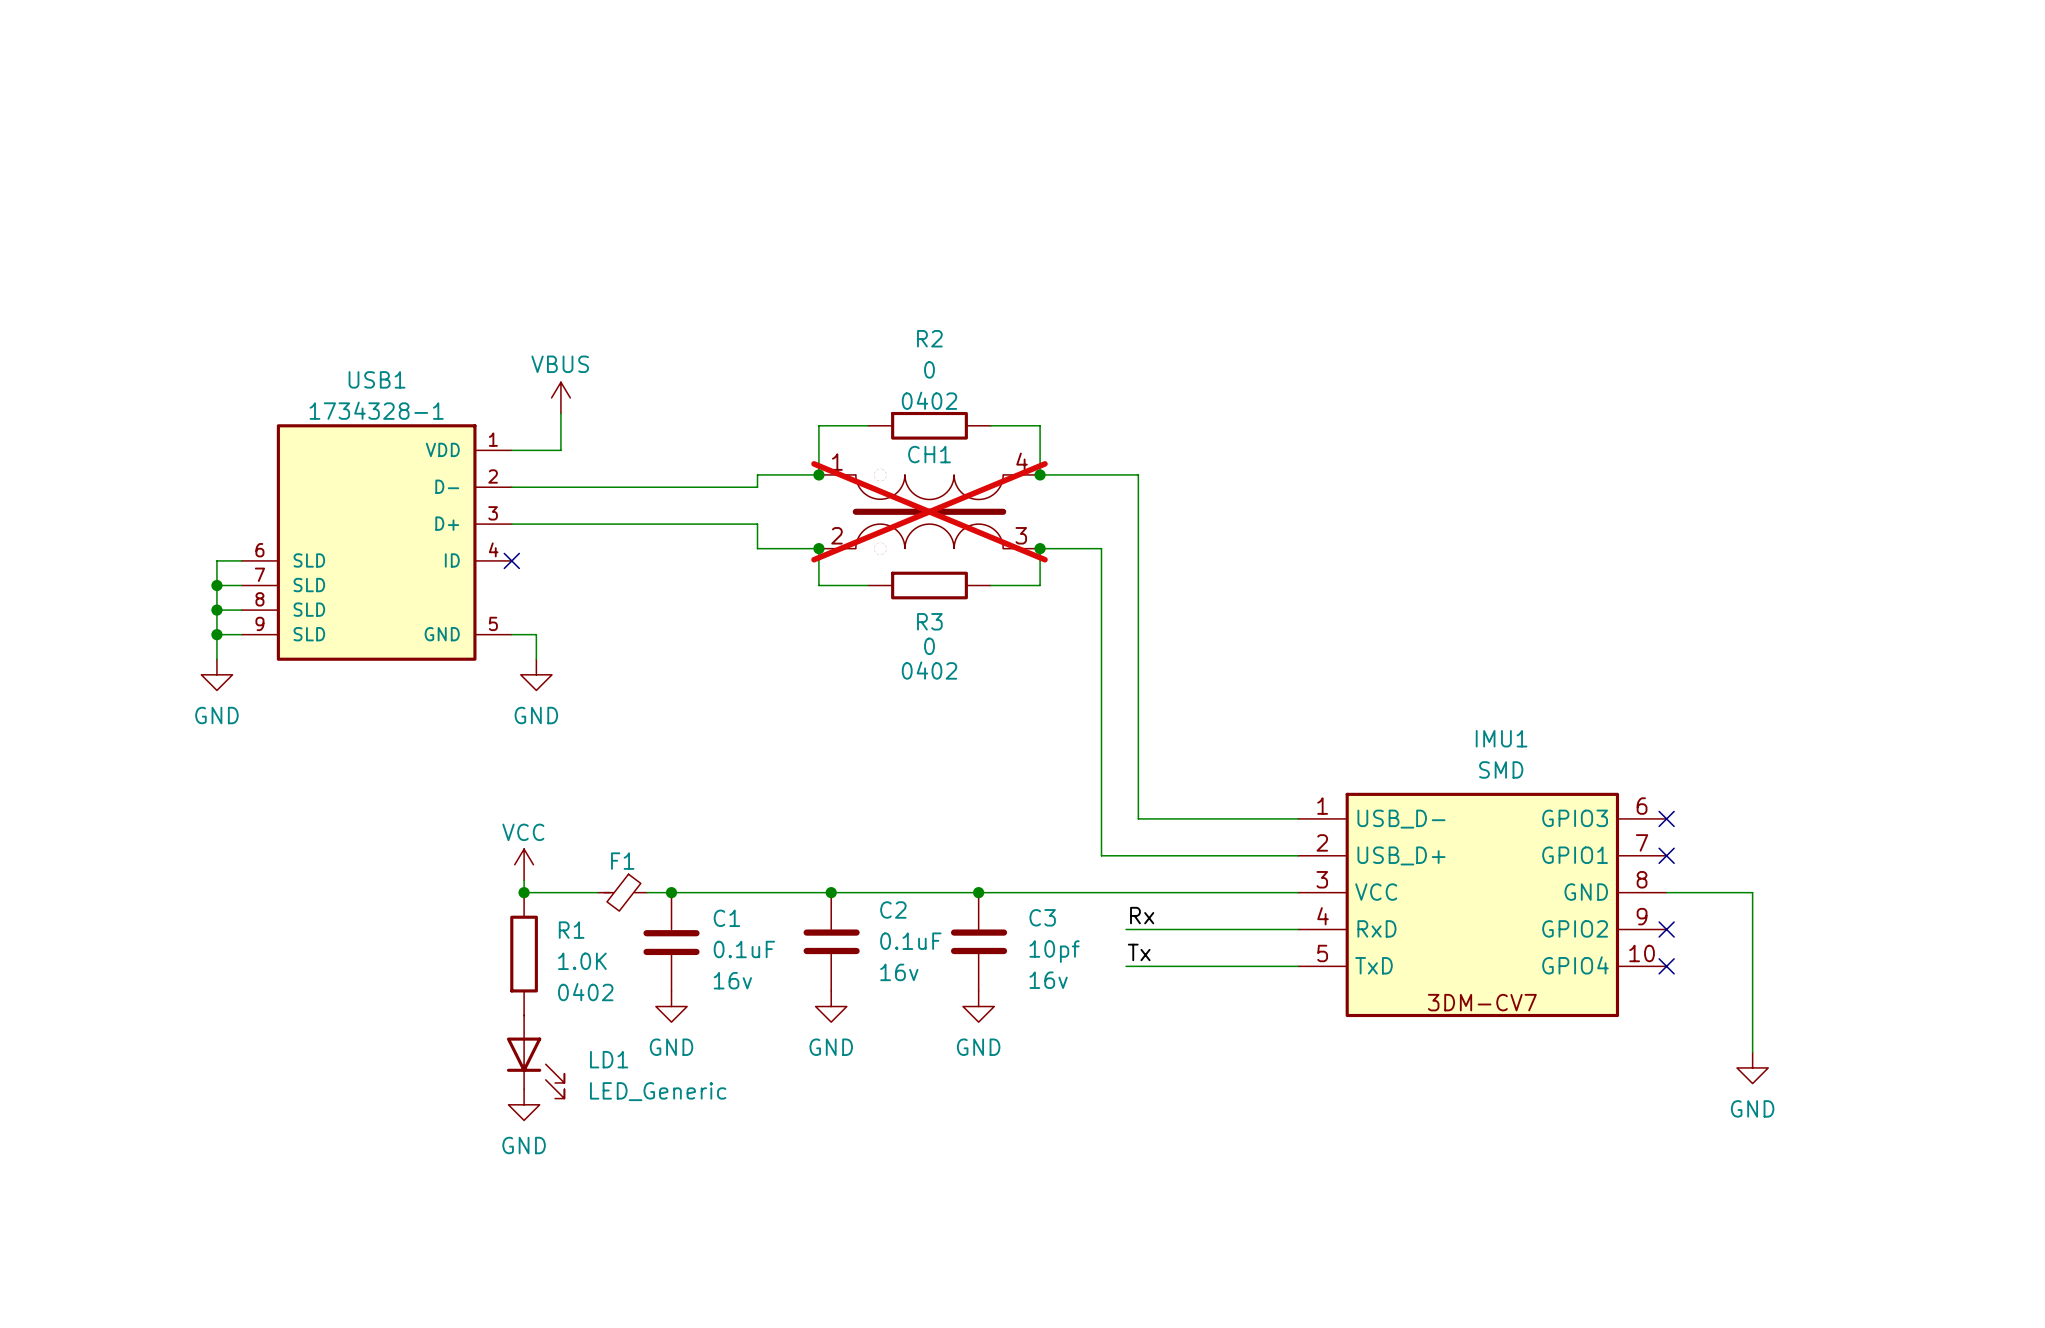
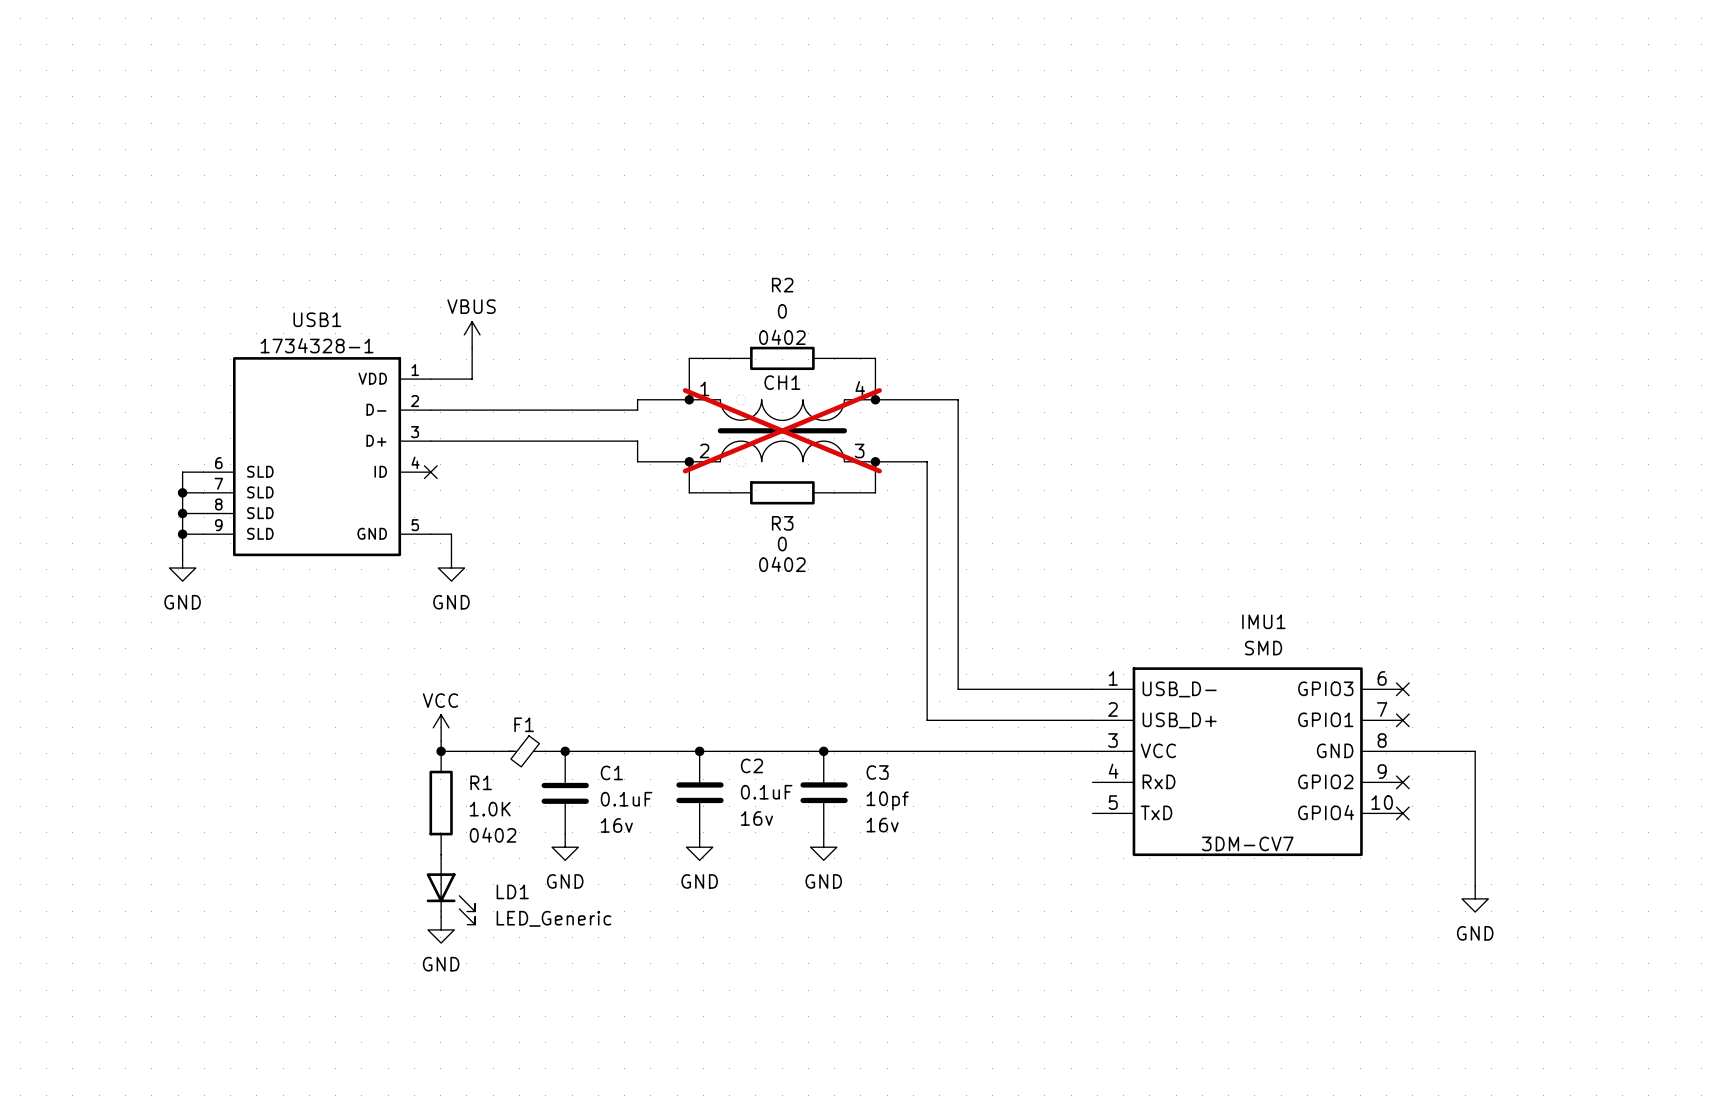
label: Rx (1142, 915) -> none
wire: (1126, 929) (1298, 929) -> none
label: Tx (1139, 952) -> none
wire: (1126, 966) (1298, 966) -> none

